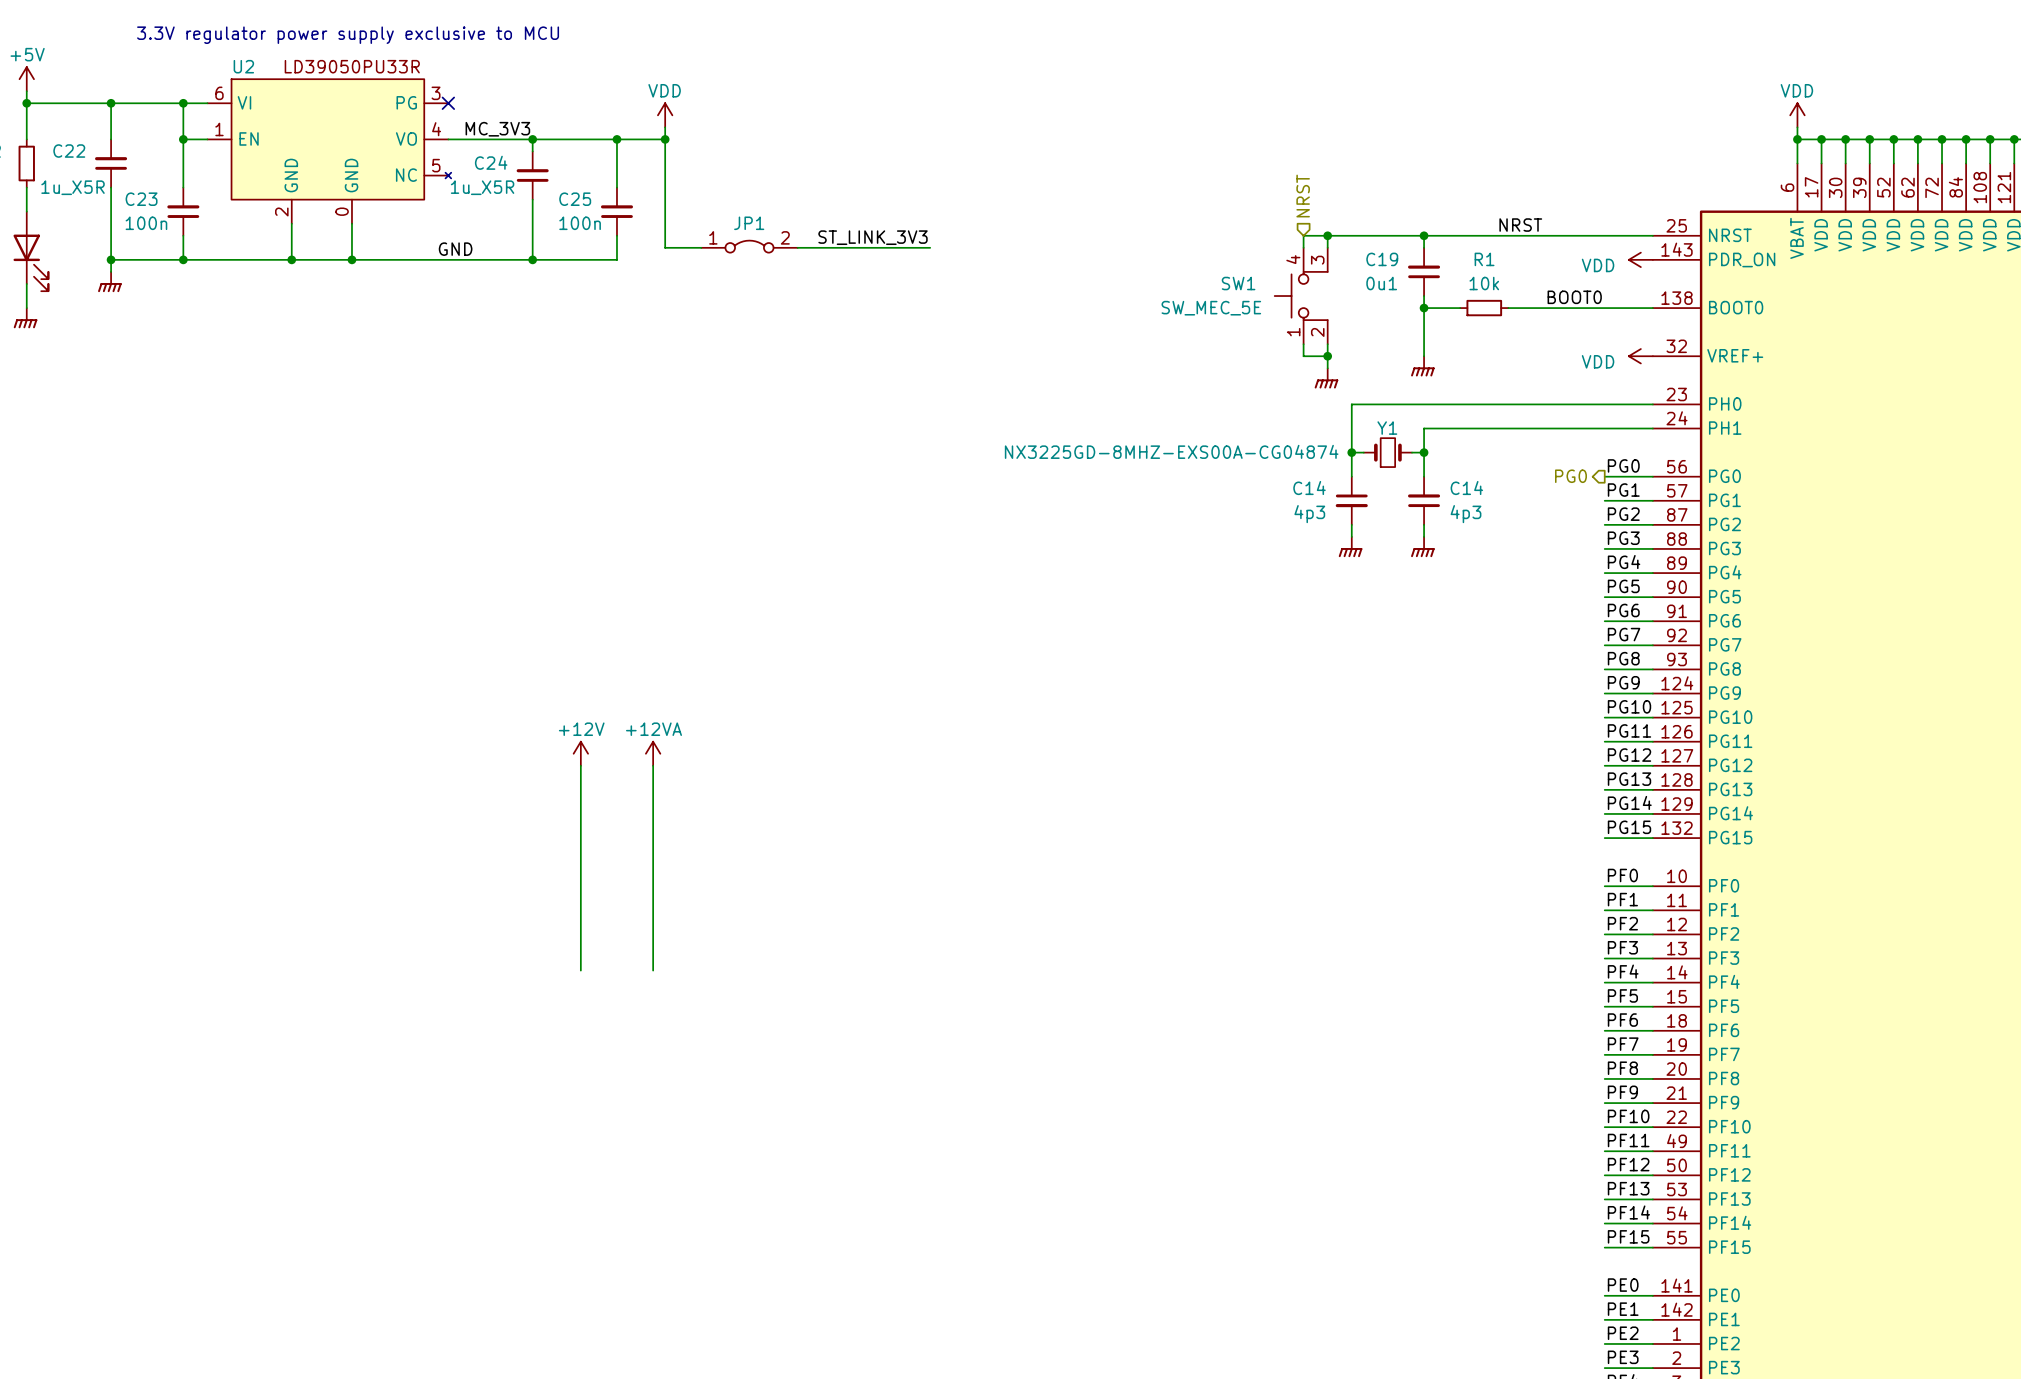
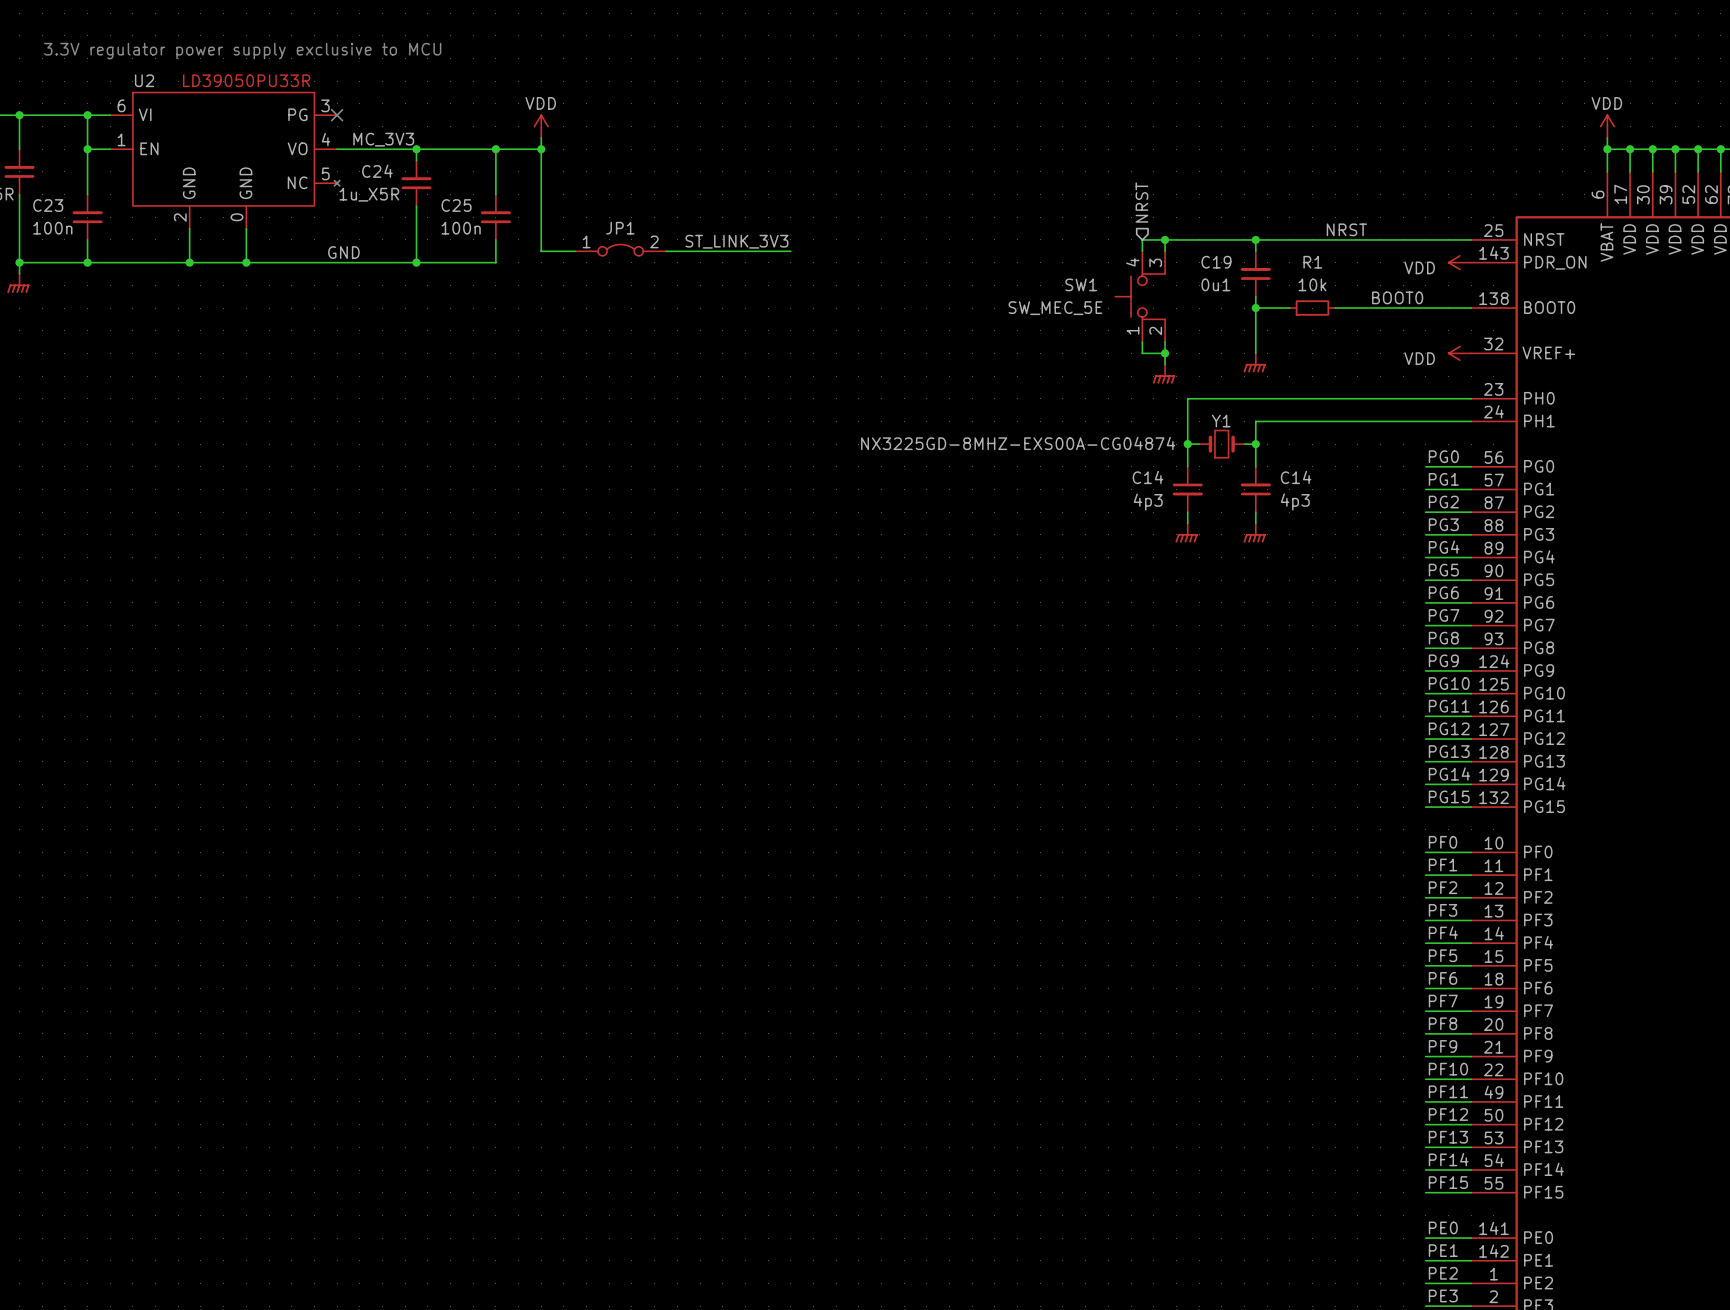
hierarchical label: PG0 (1570, 476) -> none
power symbol: +12V (580, 753) -> none
power symbol: +12VA (653, 753) -> none
wire: (580, 765) (580, 970) -> none
wire: (653, 765) (653, 970) -> none

